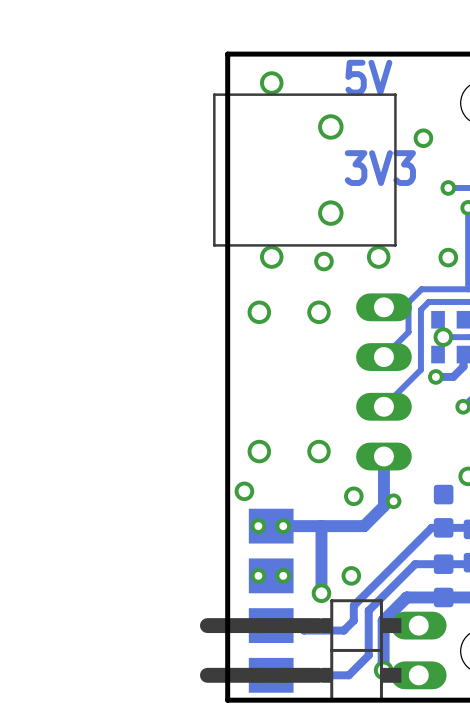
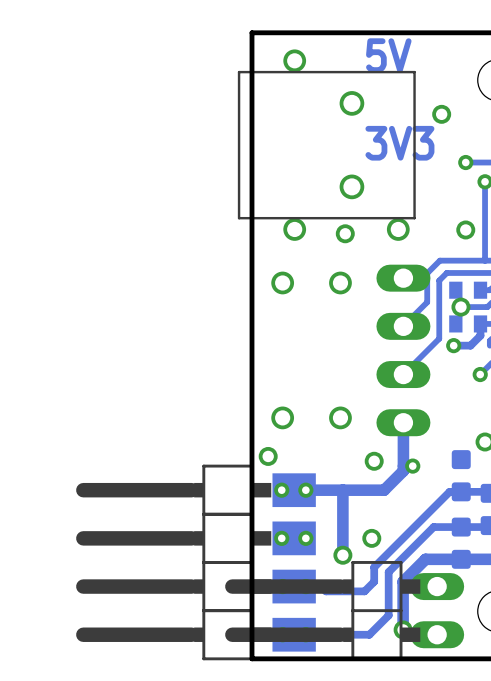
part: none -> (195, 490)
part: (271, 526) -> none
part: none -> (195, 538)
part: (271, 575) -> none
part: none -> (195, 586)
part: none -> (195, 634)

